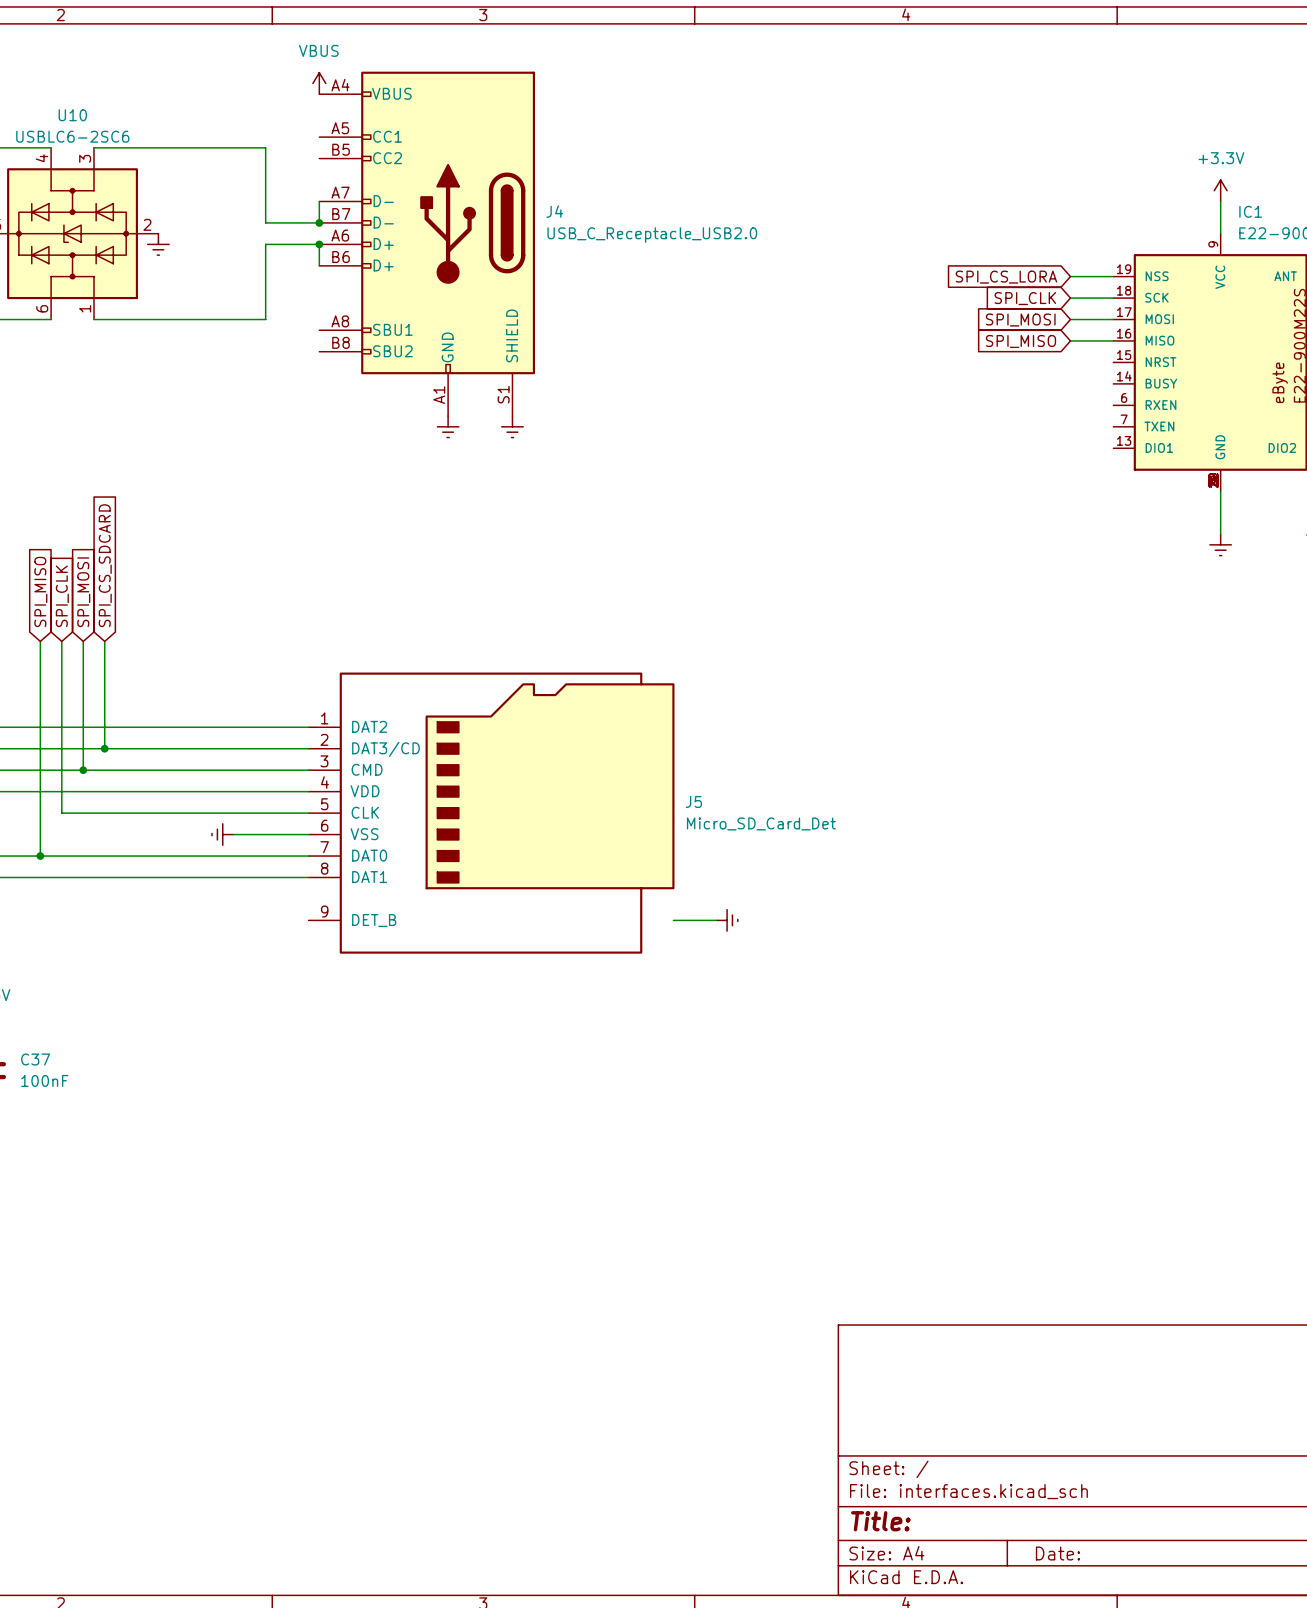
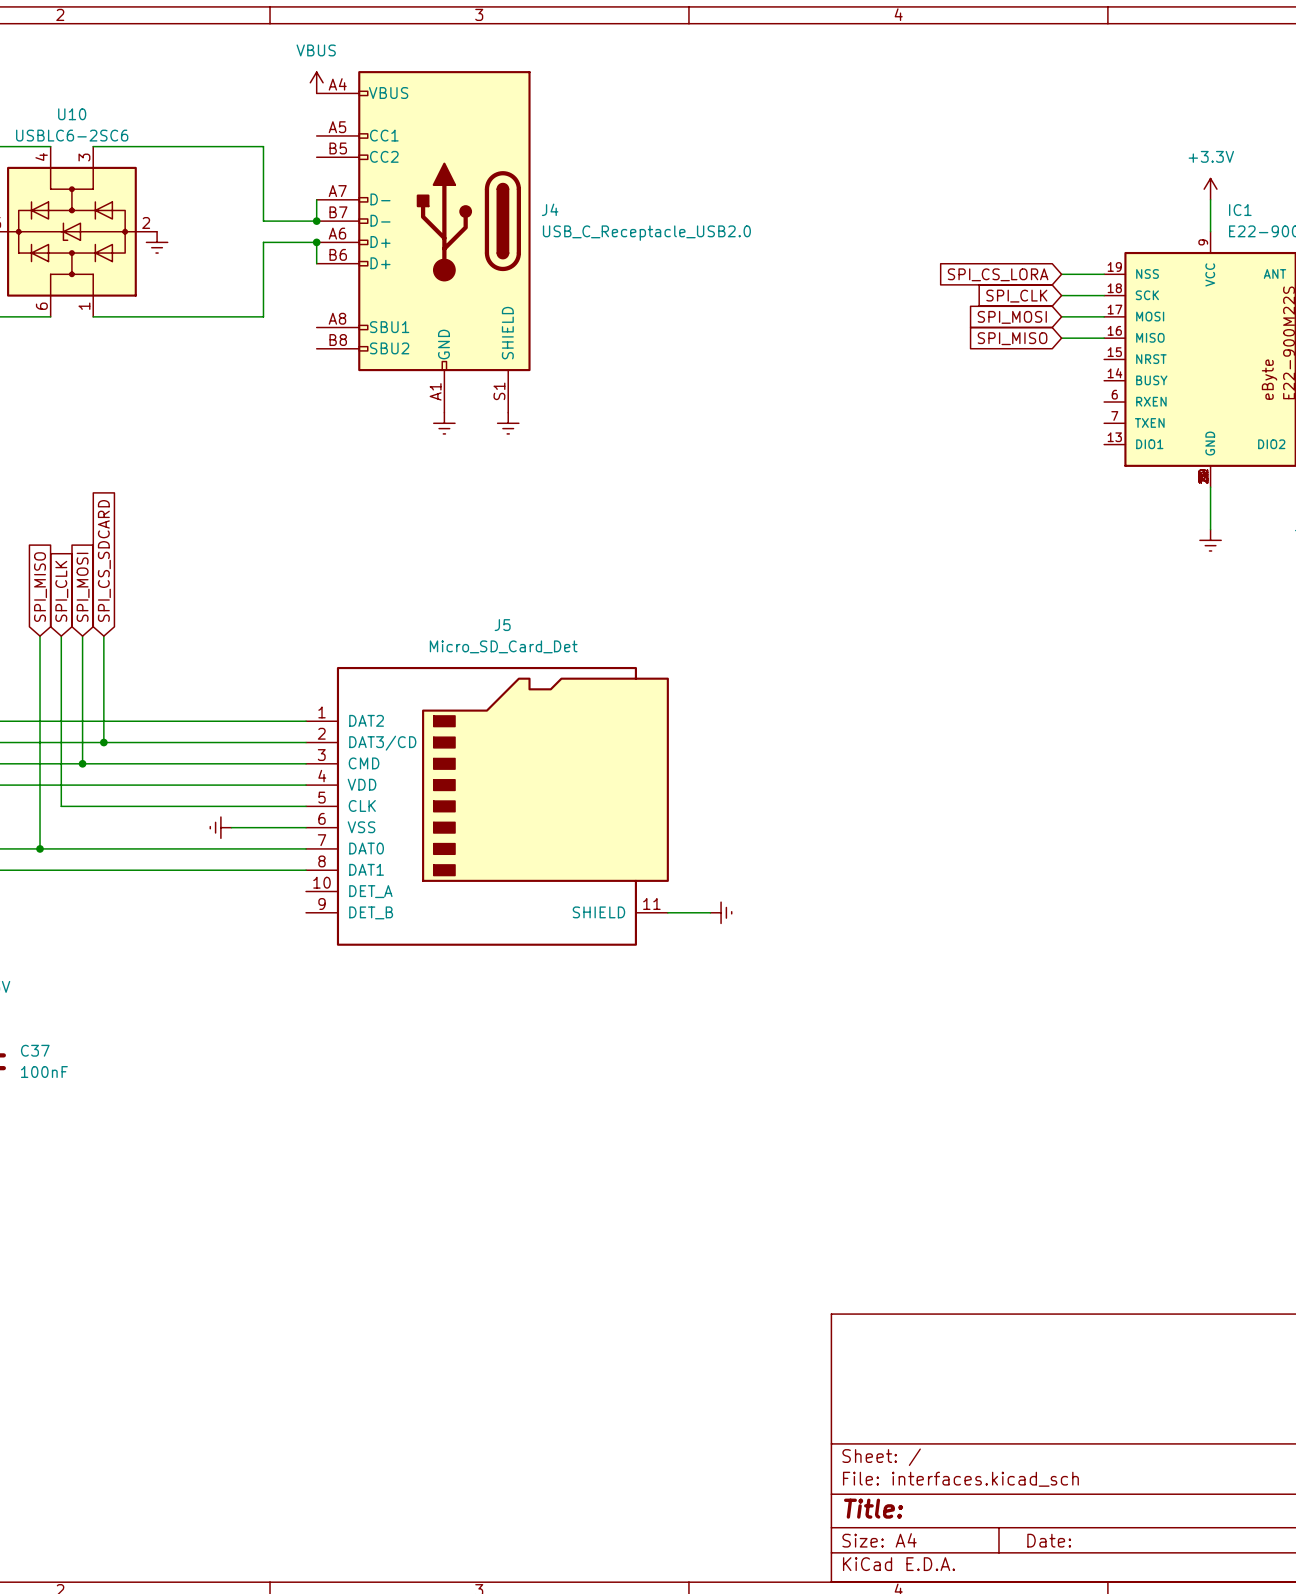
J5 symbol: [308, 672, 675, 954] -> [306, 666, 669, 946]
J5 name position: J5 (693, 801) -> J5 (502, 625)
J5 value position: Micro_SD_Card_Det (761, 823) -> Micro_SD_Card_Det (503, 646)

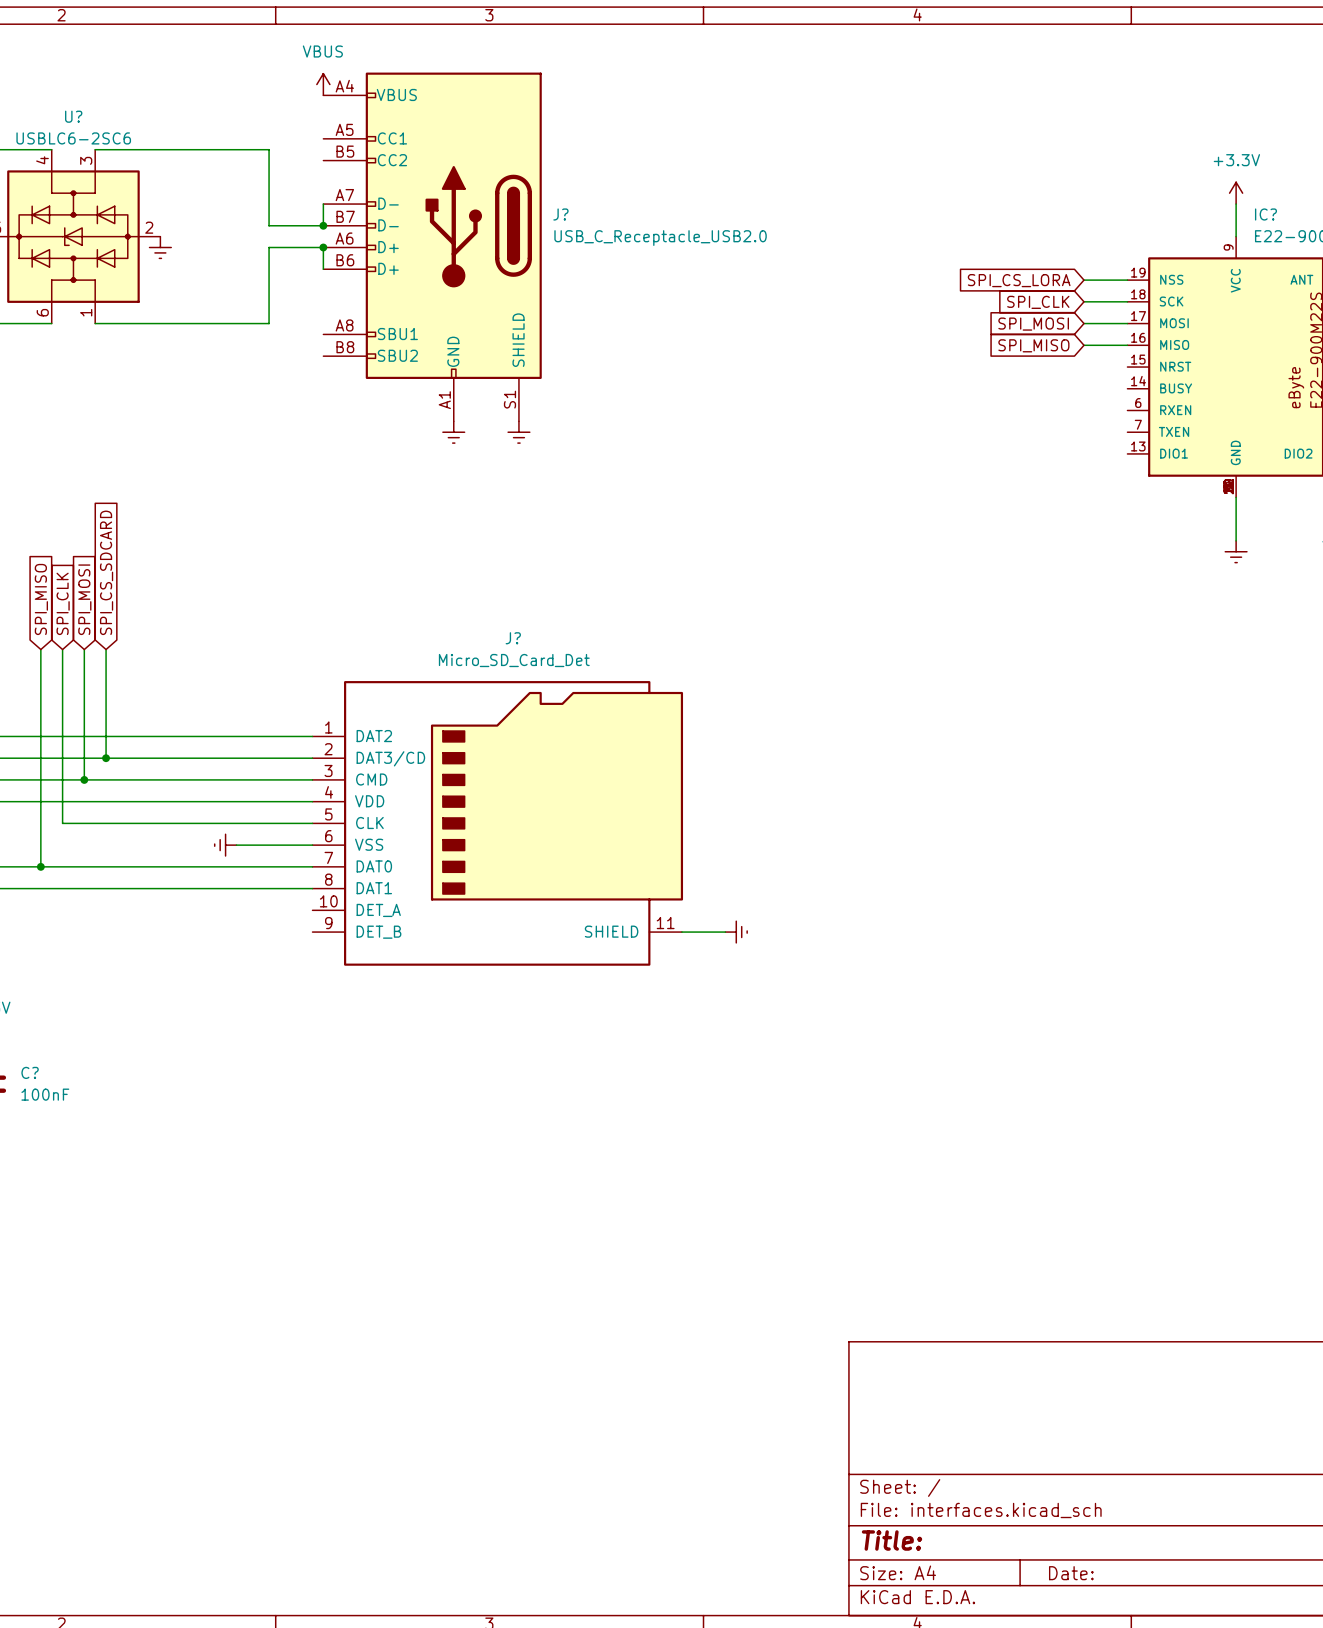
U10 name: U10 (72, 114) -> U? (73, 116)
J4 name: J4 (550, 209) -> J? (560, 214)
IC1 name: IC1 (1240, 210) -> IC? (1265, 214)
J5 name: J5 (502, 625) -> J? (513, 638)
C37 name: C37 (35, 1050) -> C? (30, 1072)

